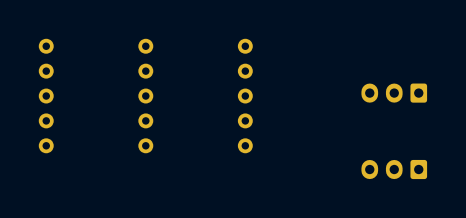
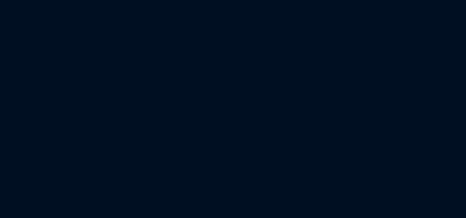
part: (394, 93) -> none
part: (46, 96) -> none
part: (145, 96) -> none
part: (245, 96) -> none
part: (394, 169) -> none

